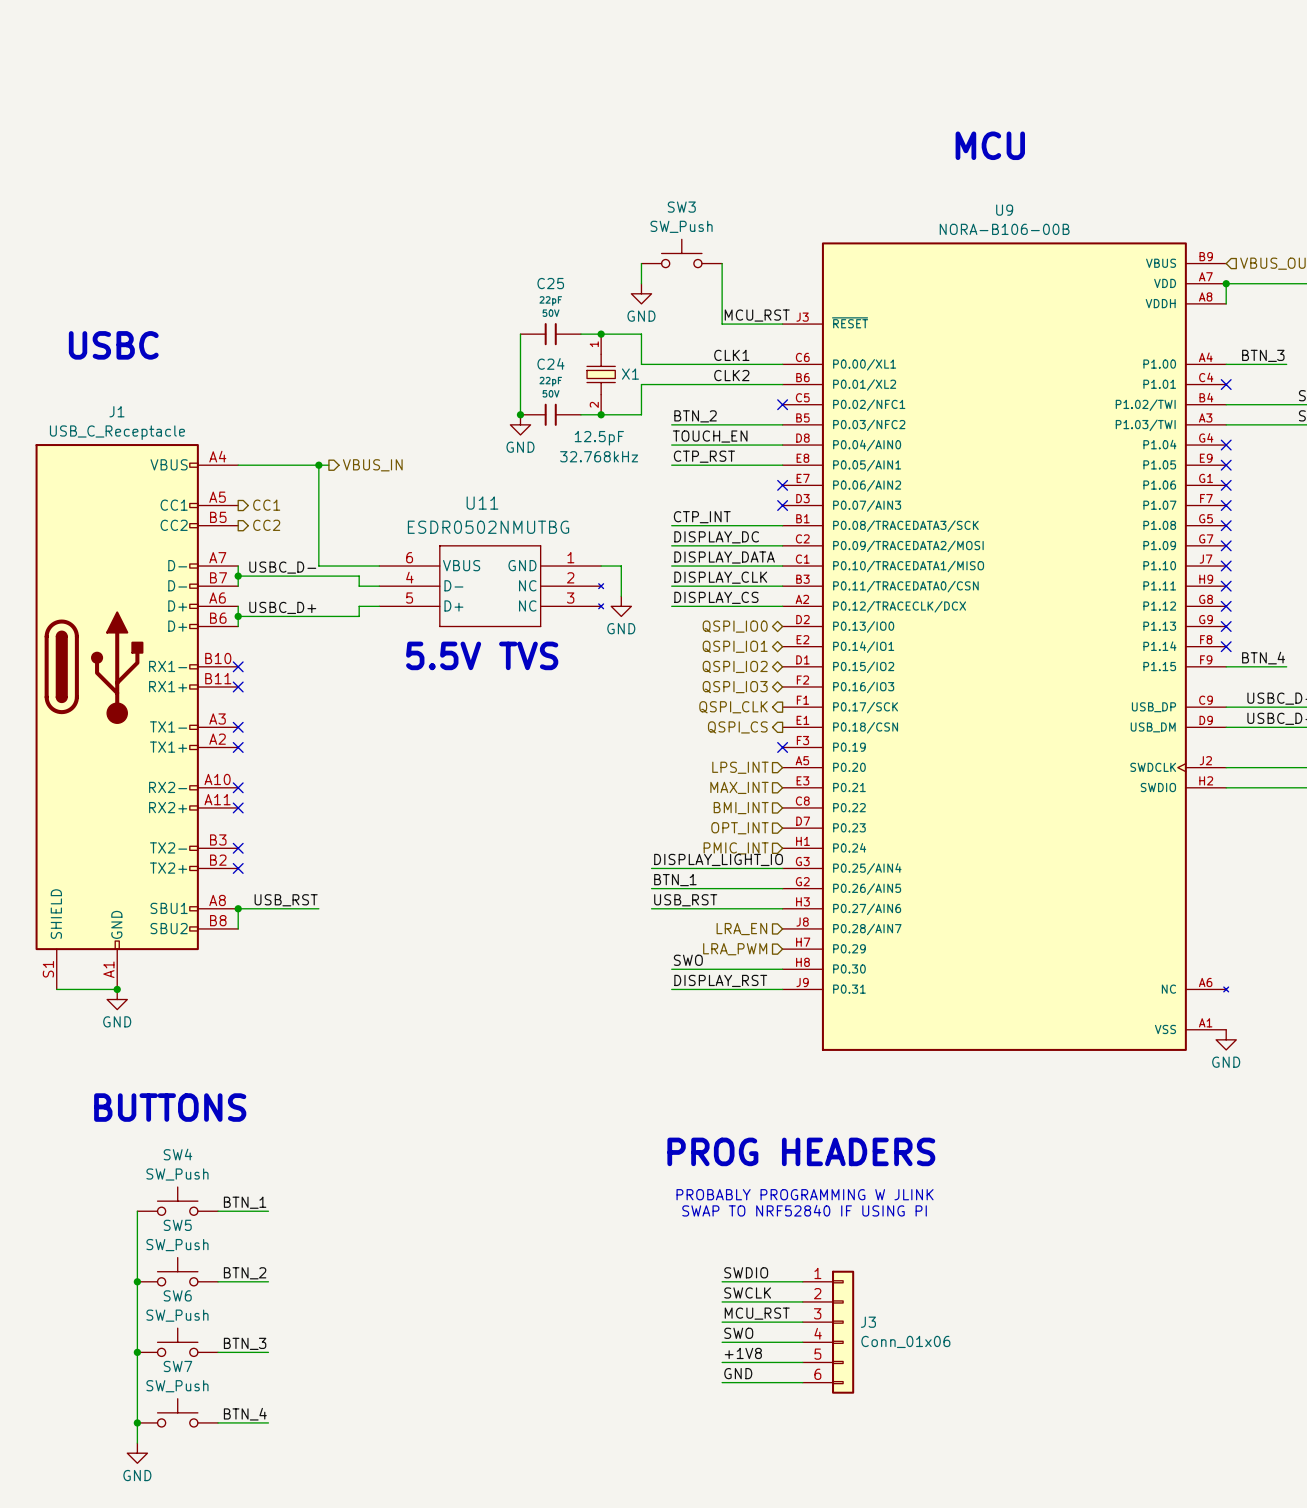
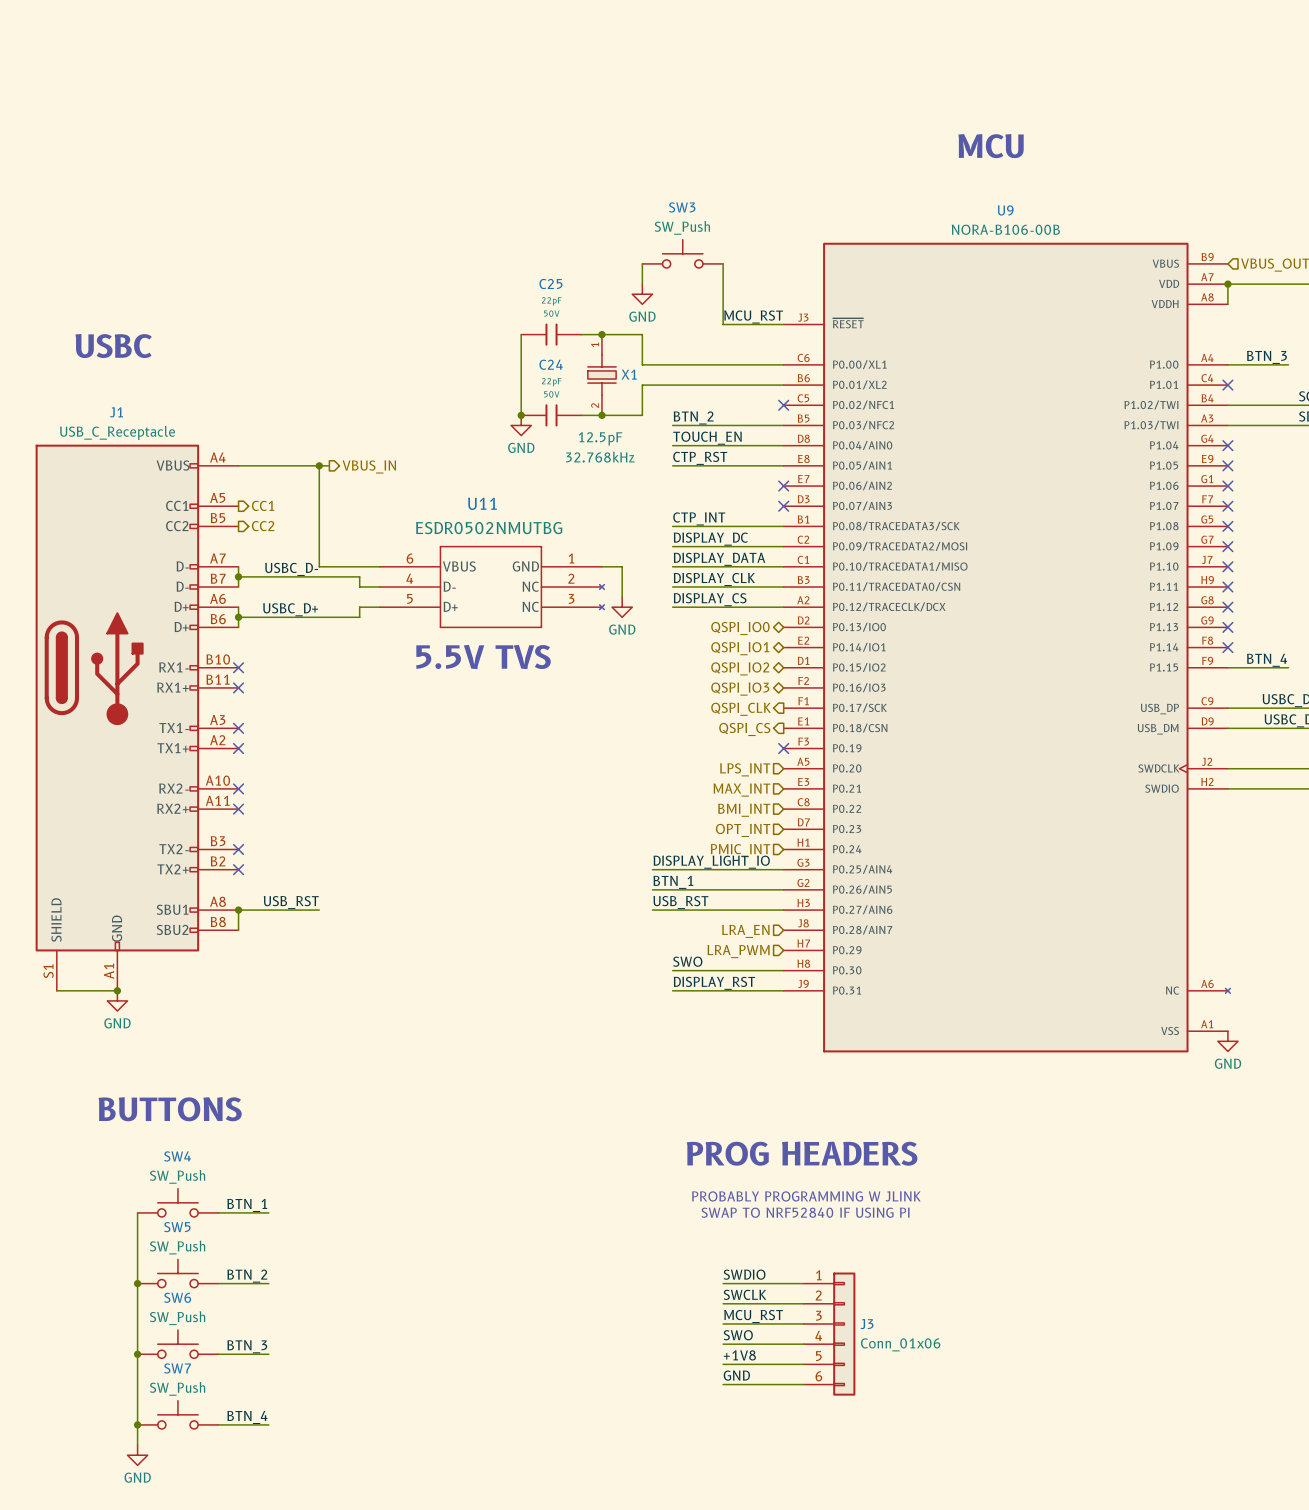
label: CLK1 (731, 355) -> none
label: CLK2 (731, 375) -> none

